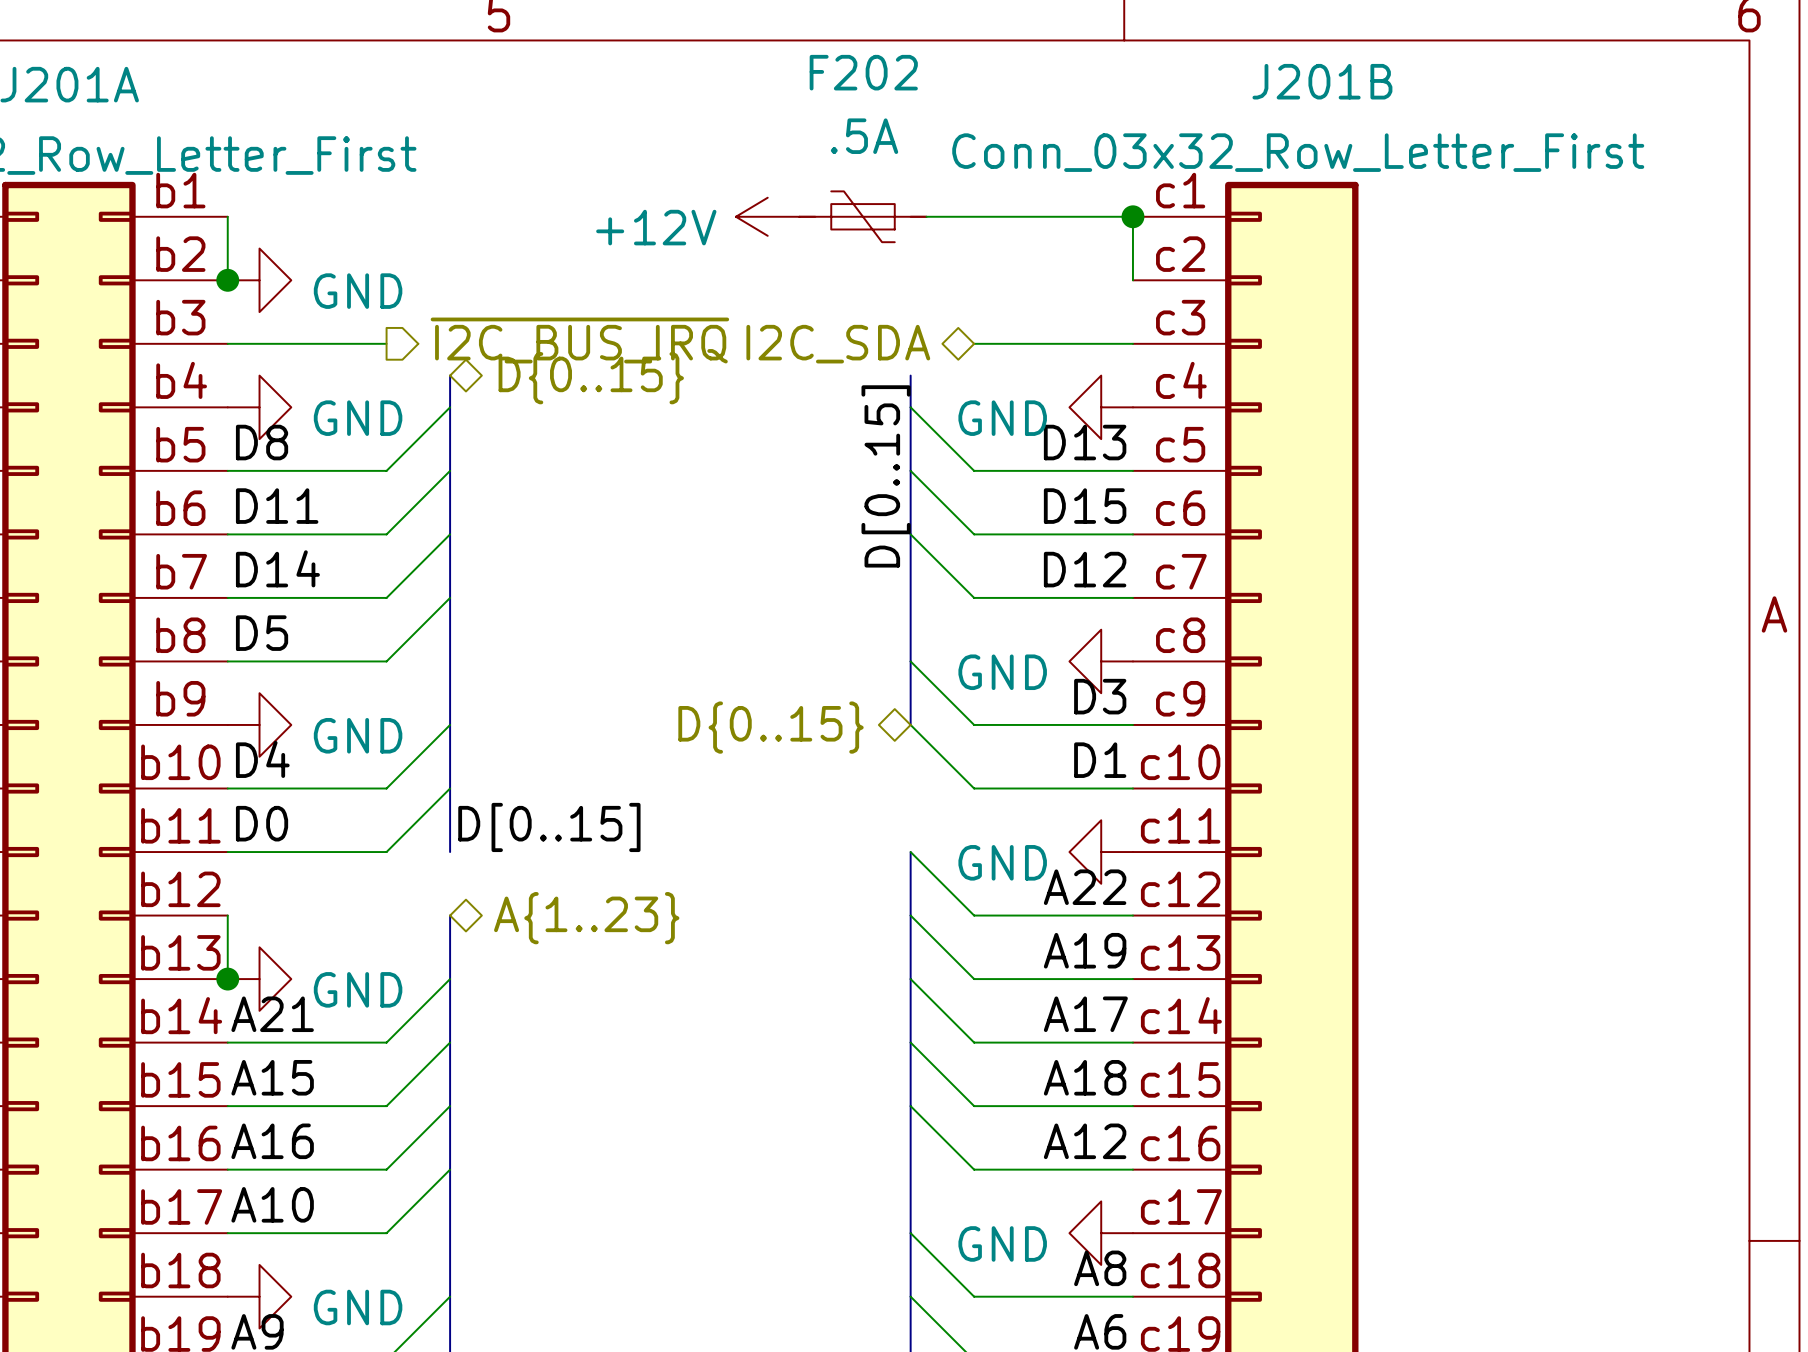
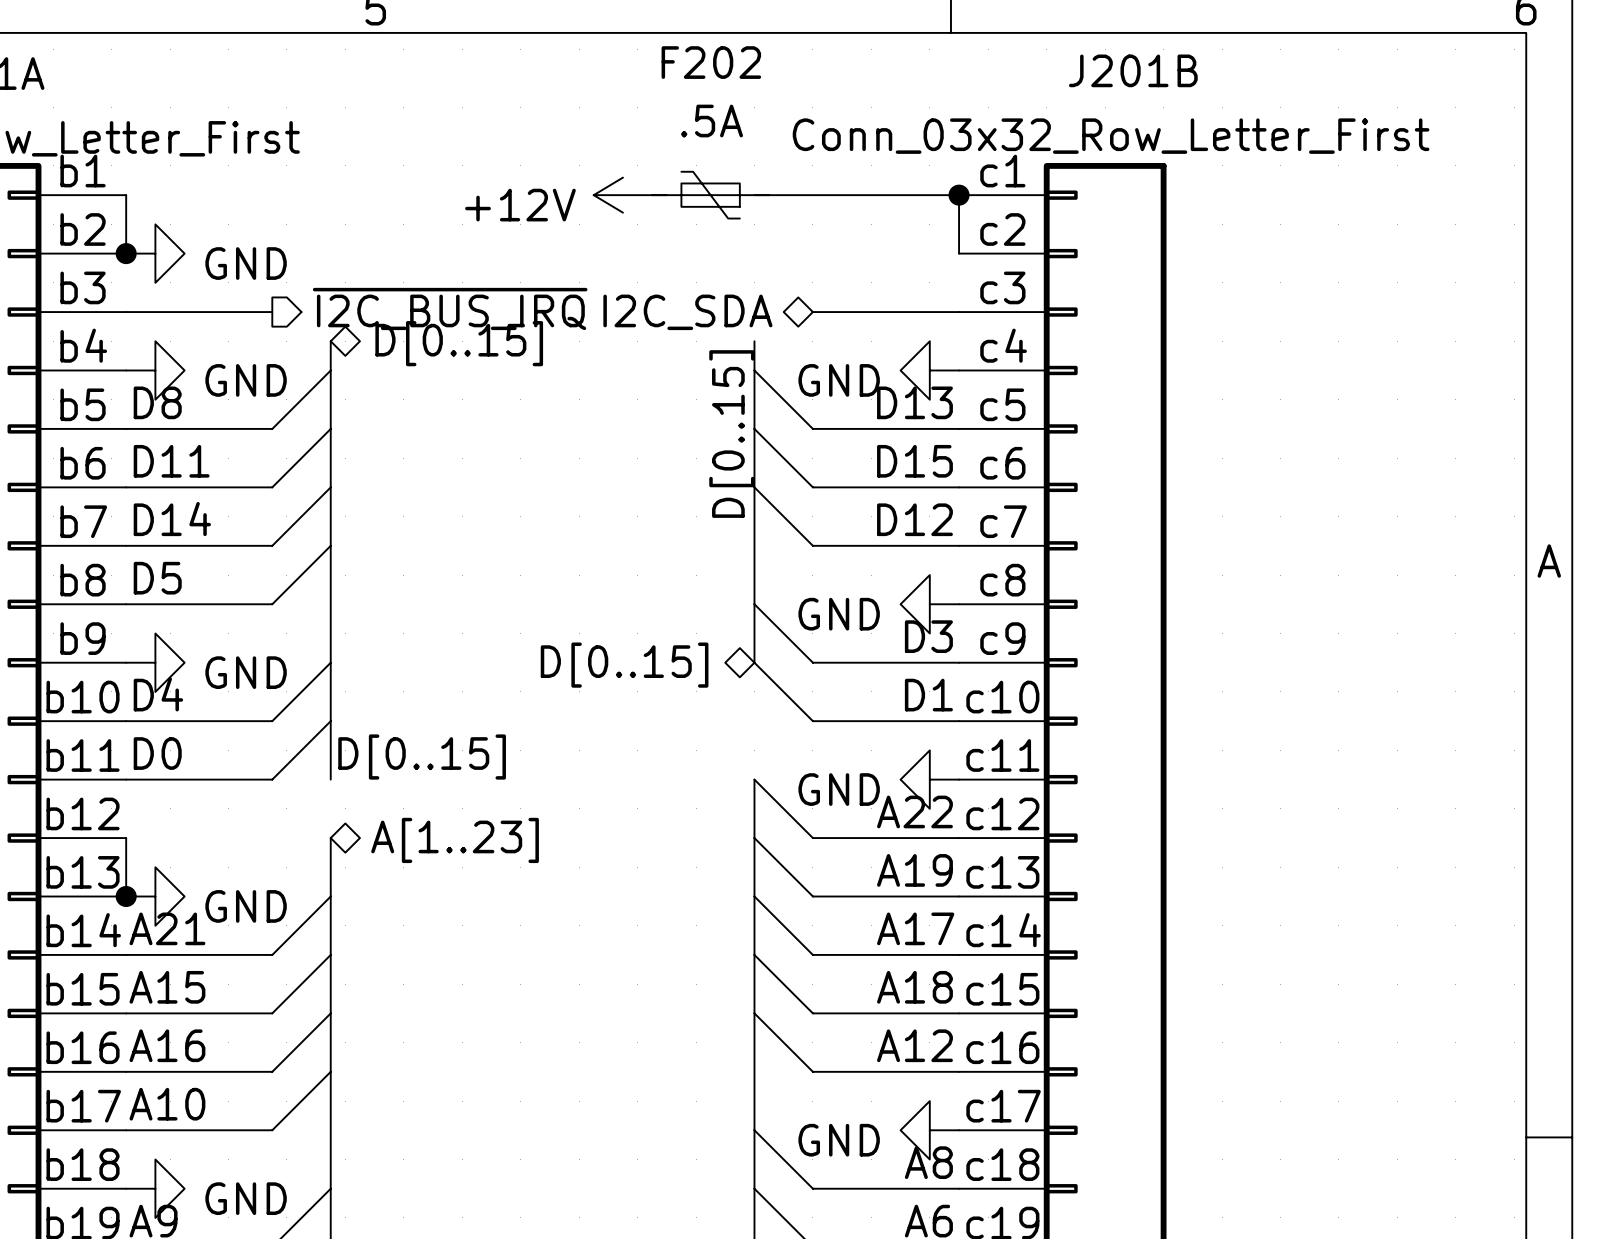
hierarchical label: D{0..15} (591, 378) -> D[0..15] (459, 343)
hierarchical label: D{0..15} (771, 727) -> D[0..15] (624, 665)
hierarchical label: A{1..23} (586, 918) -> A[1..23] (455, 840)

